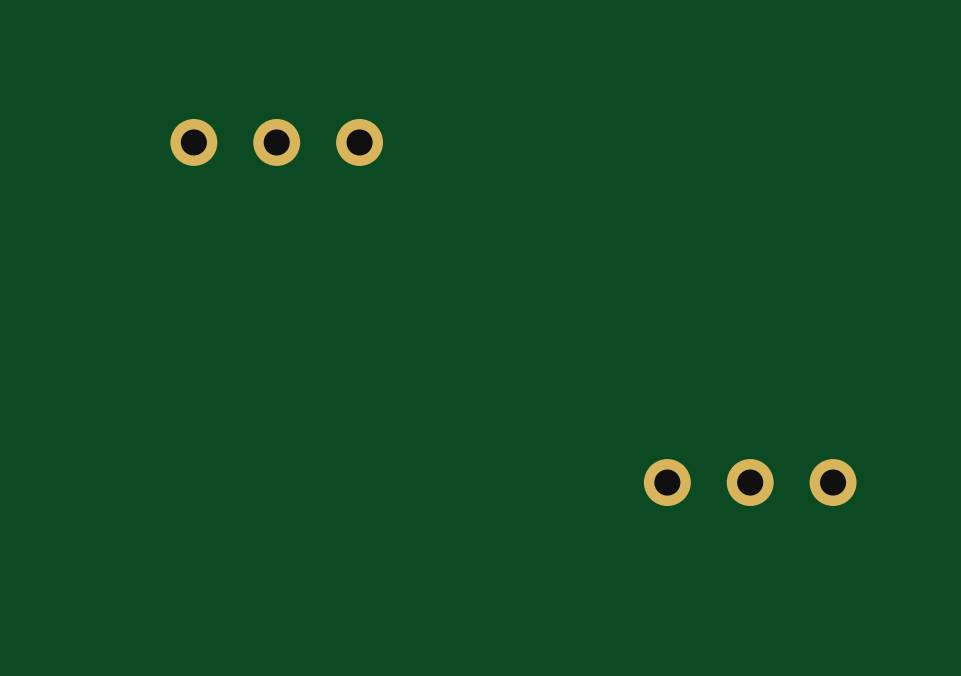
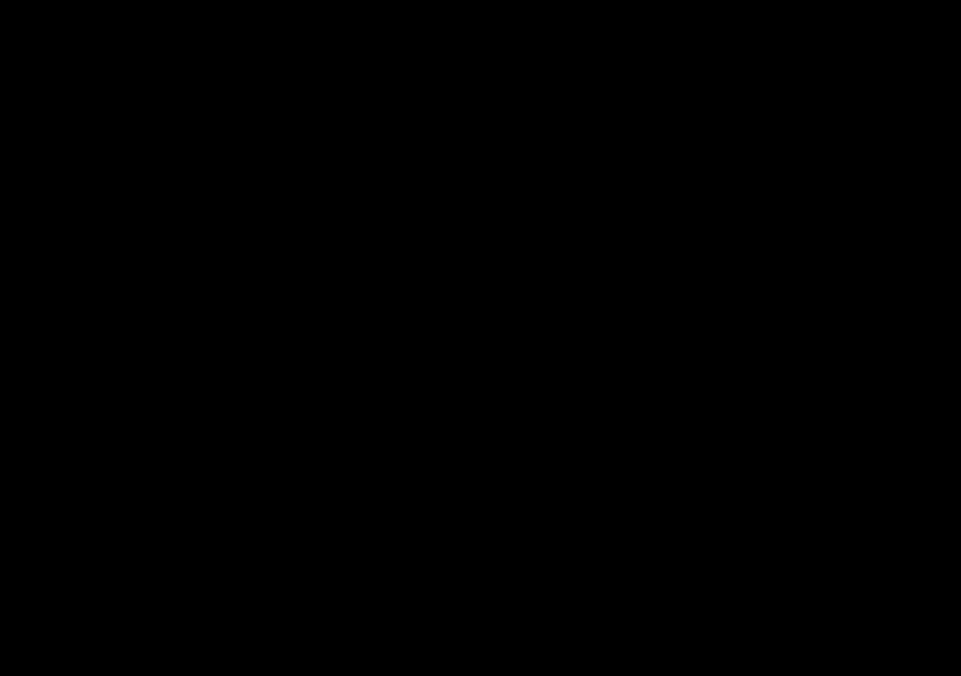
part: (276, 142) -> none
part: (750, 482) -> none

